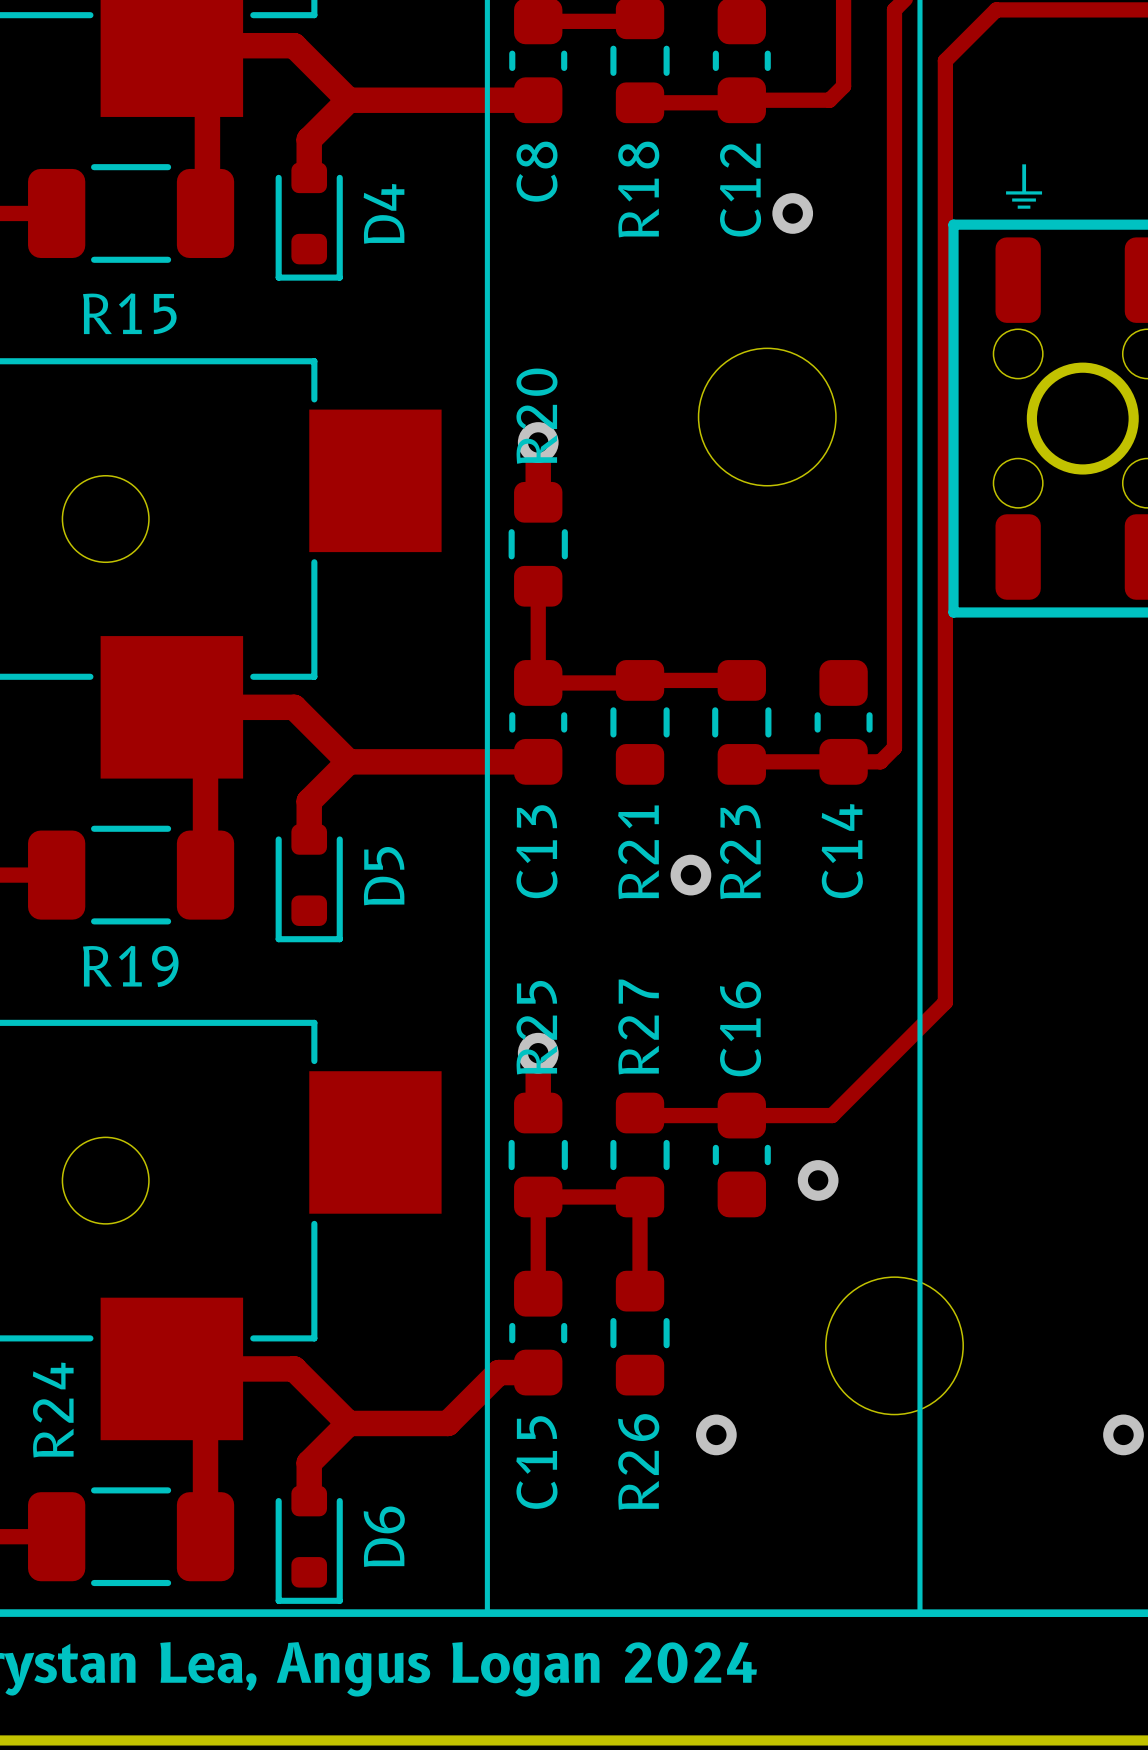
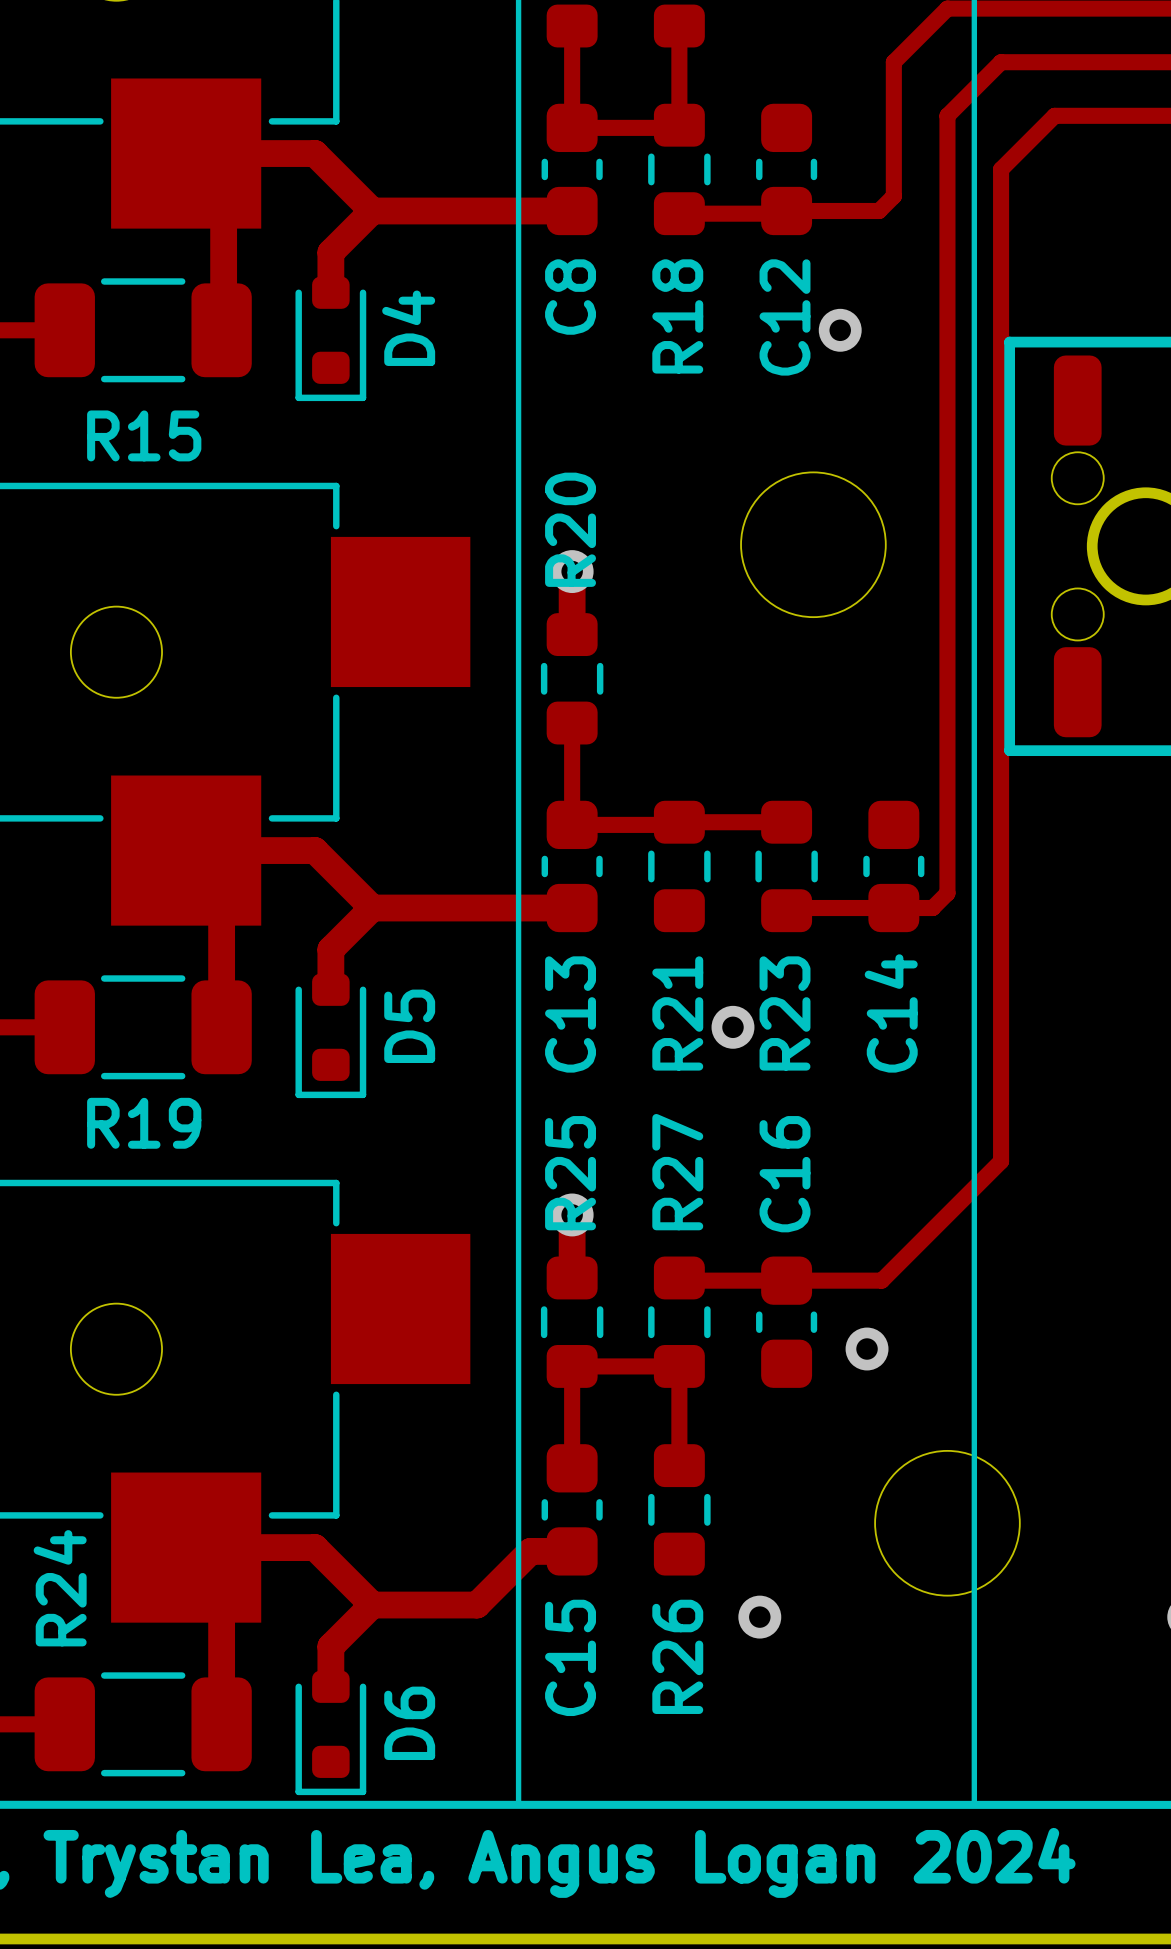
text: ⏚ (1024, 186) -> none

